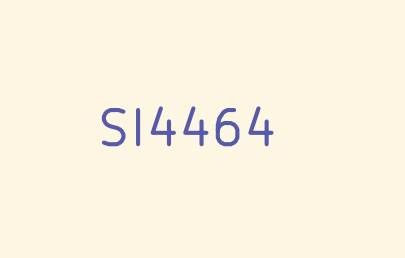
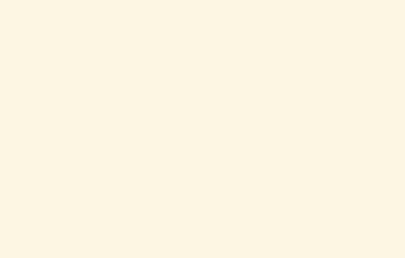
text: SI4464 (187, 126) -> none

